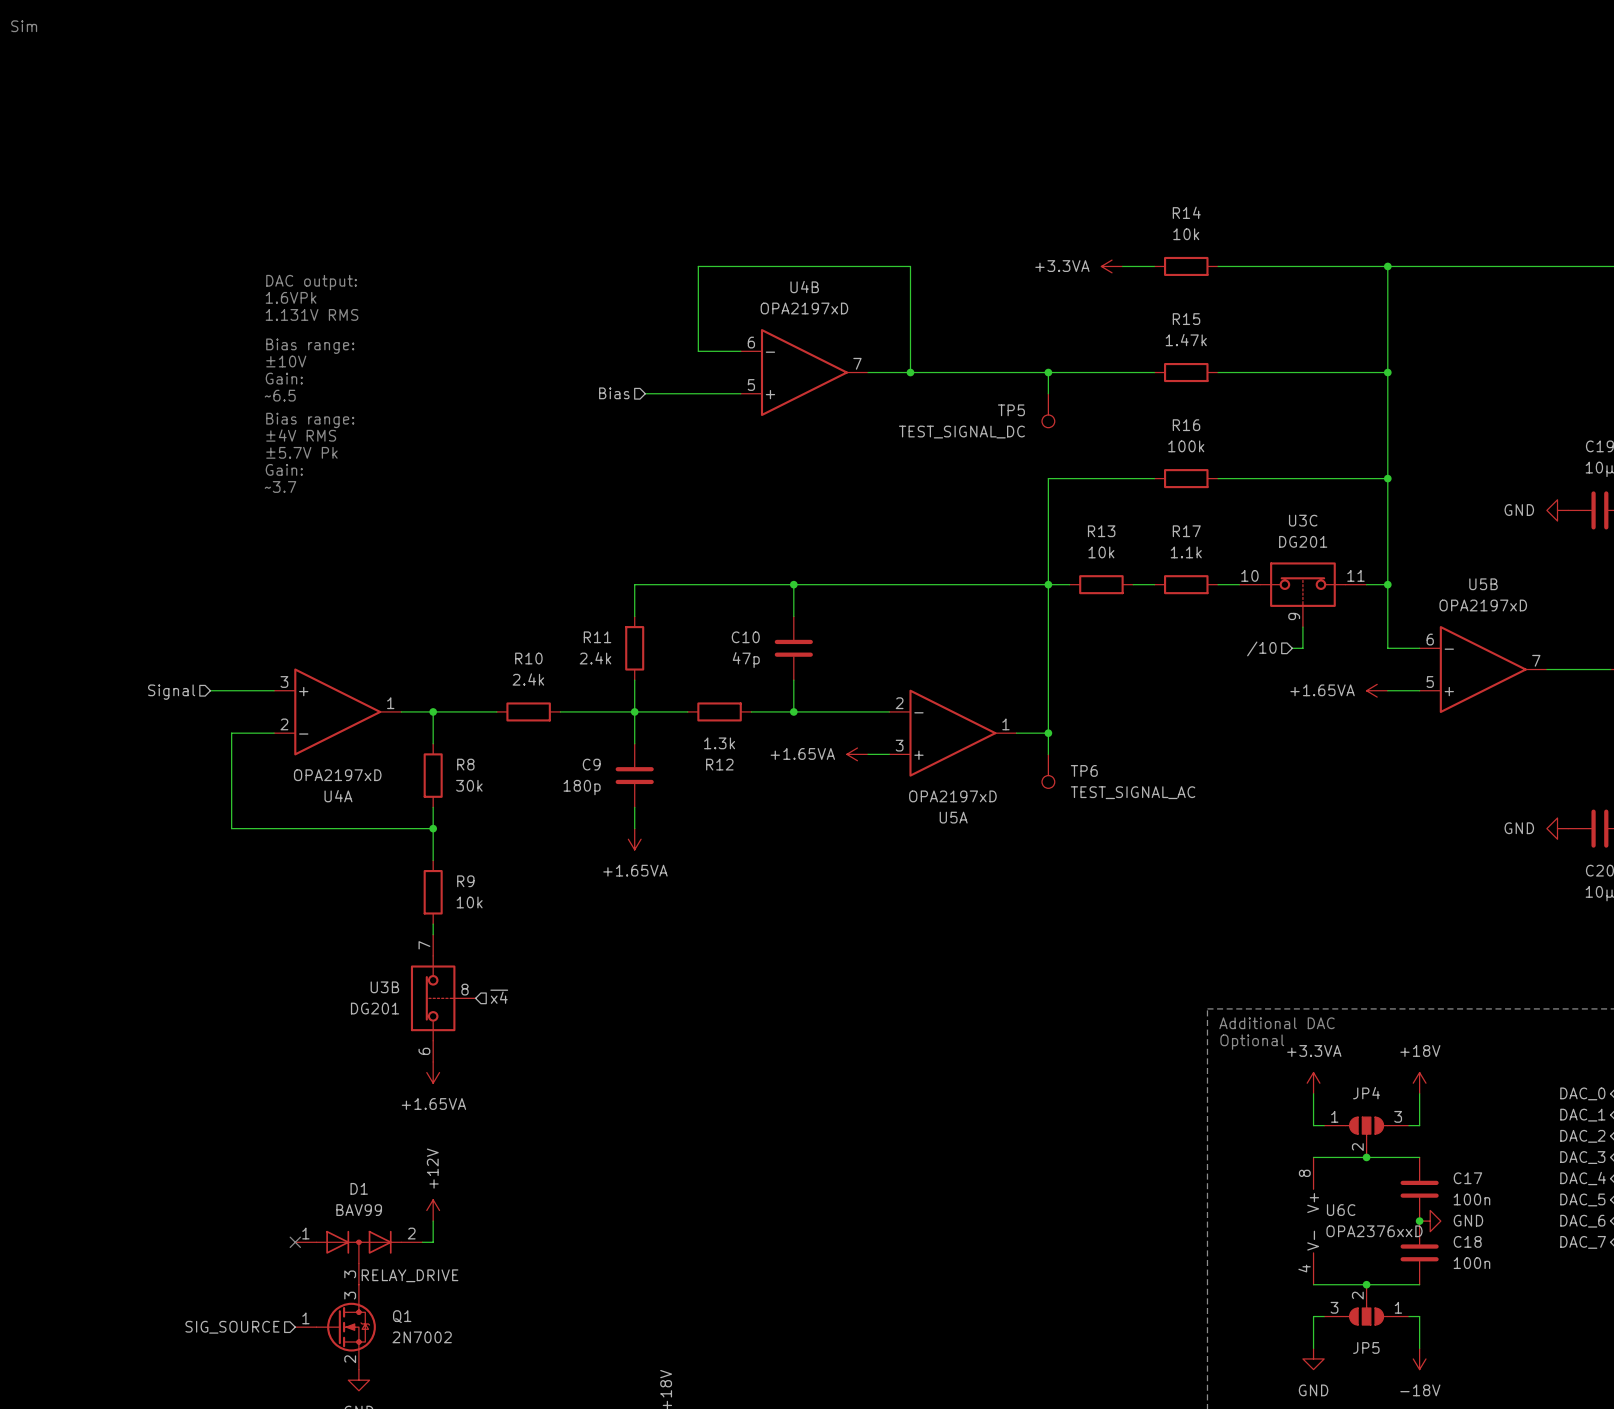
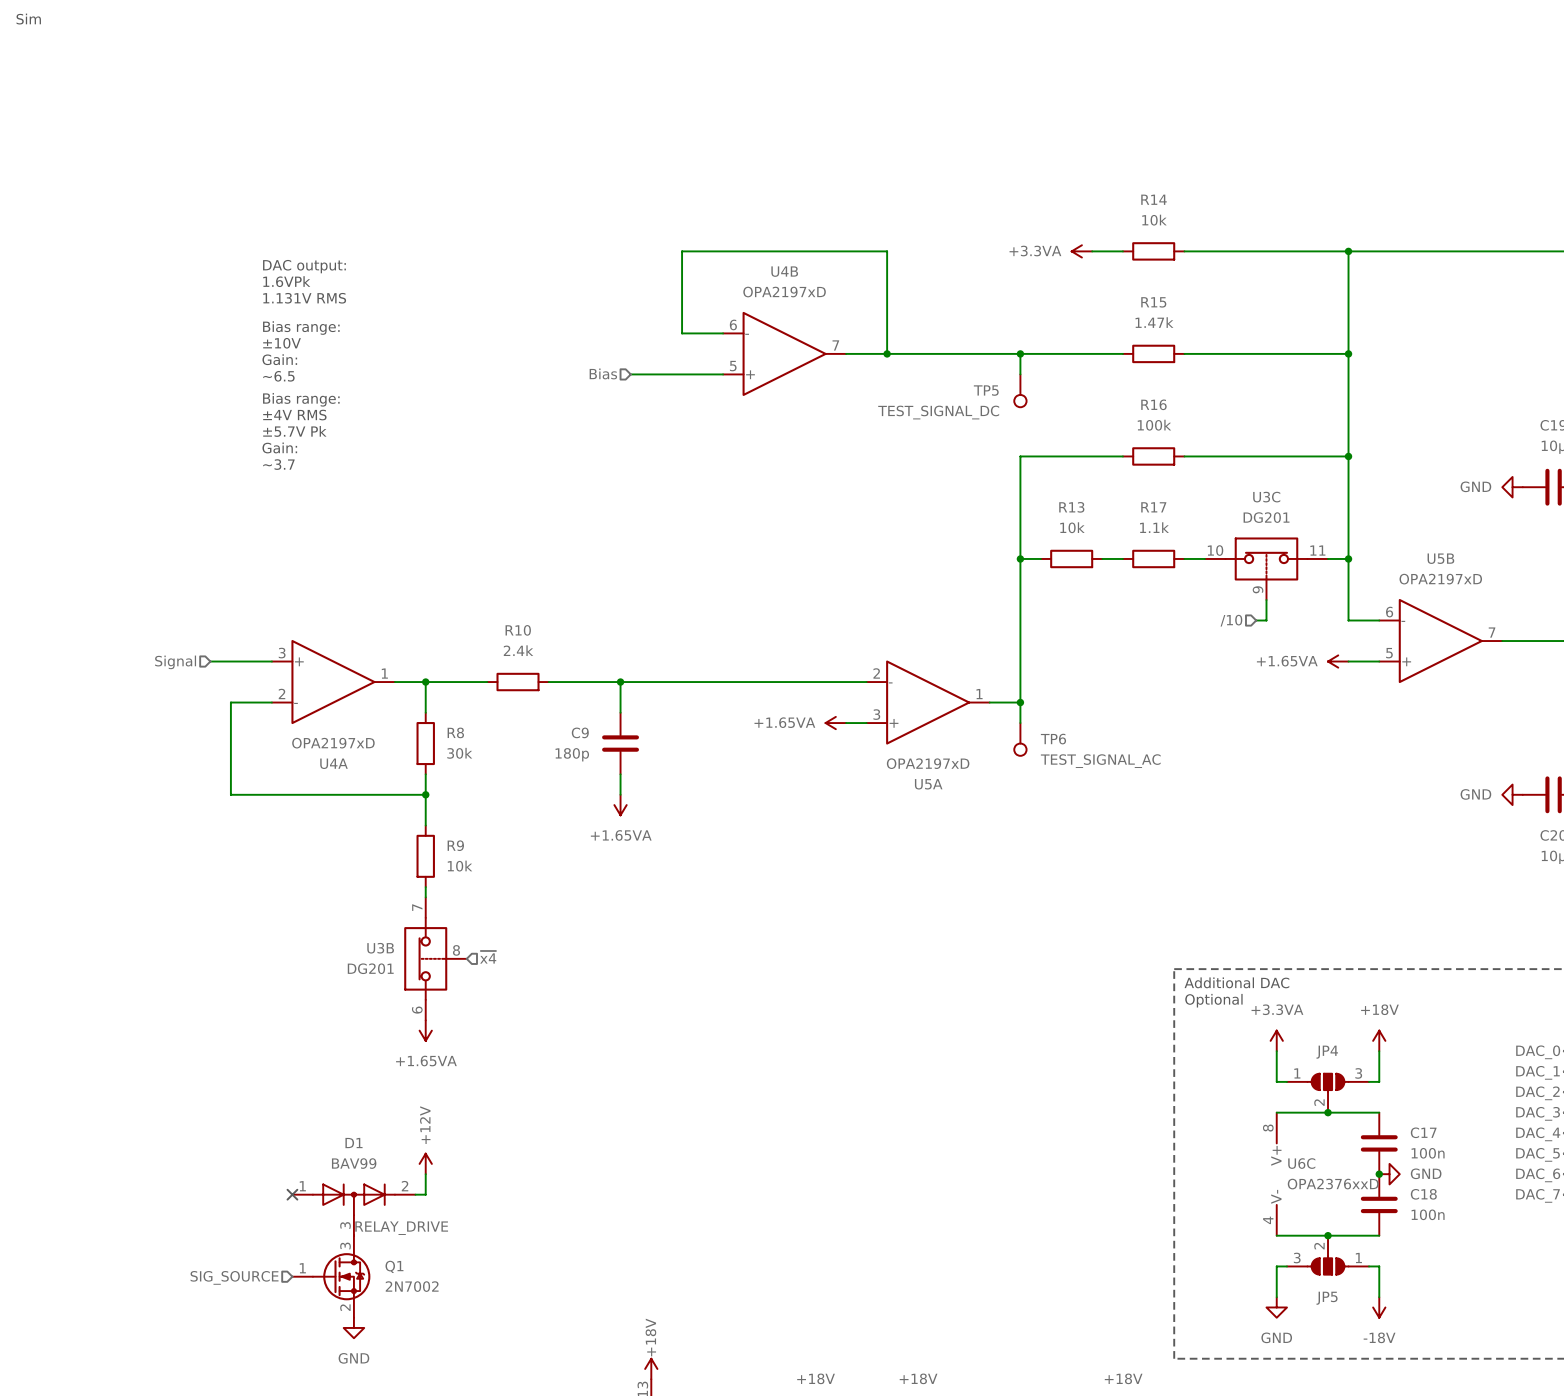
wire: (793, 584) (793, 616) -> none
junction: (793, 584) -> none
wire: (1048, 584) (634, 584) (634, 616) -> none
R11: 2.4k (634, 648) -> none
C10: 47p (793, 648) -> none
wire: (634, 680) (634, 711) -> none
wire: (793, 680) (793, 711) -> none
wire: none -> (671, 682) (733, 682)
R12: 1.3k (719, 711) -> none
junction: (793, 711) -> none

